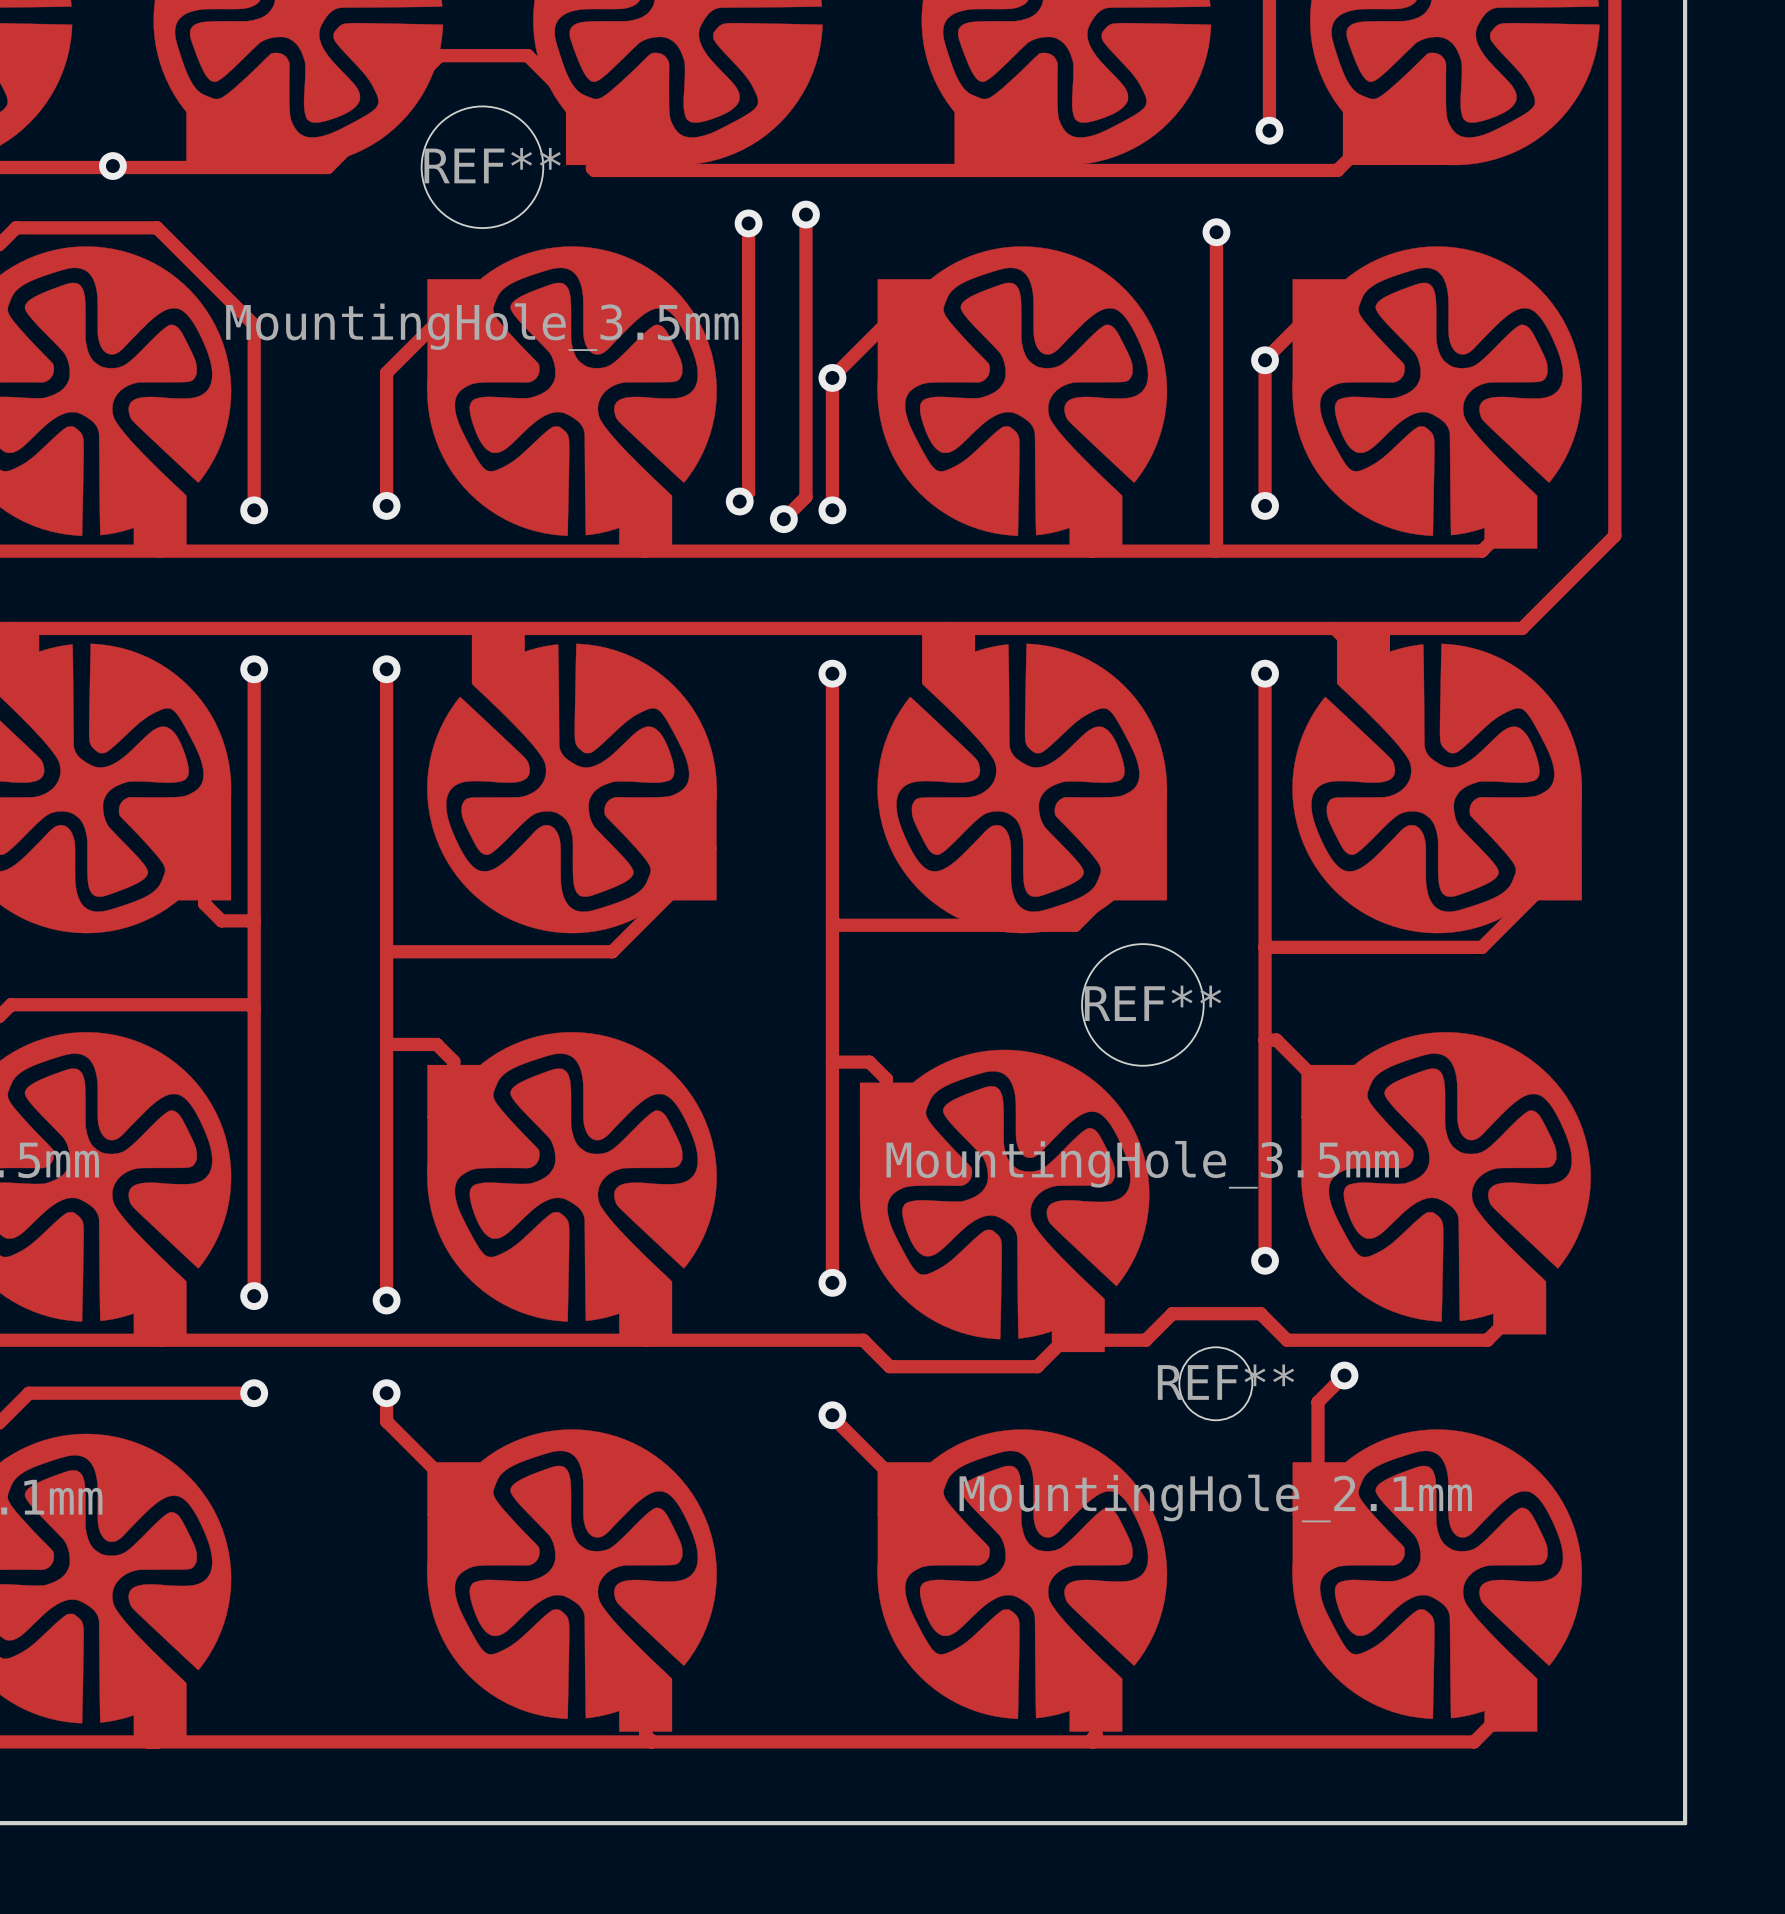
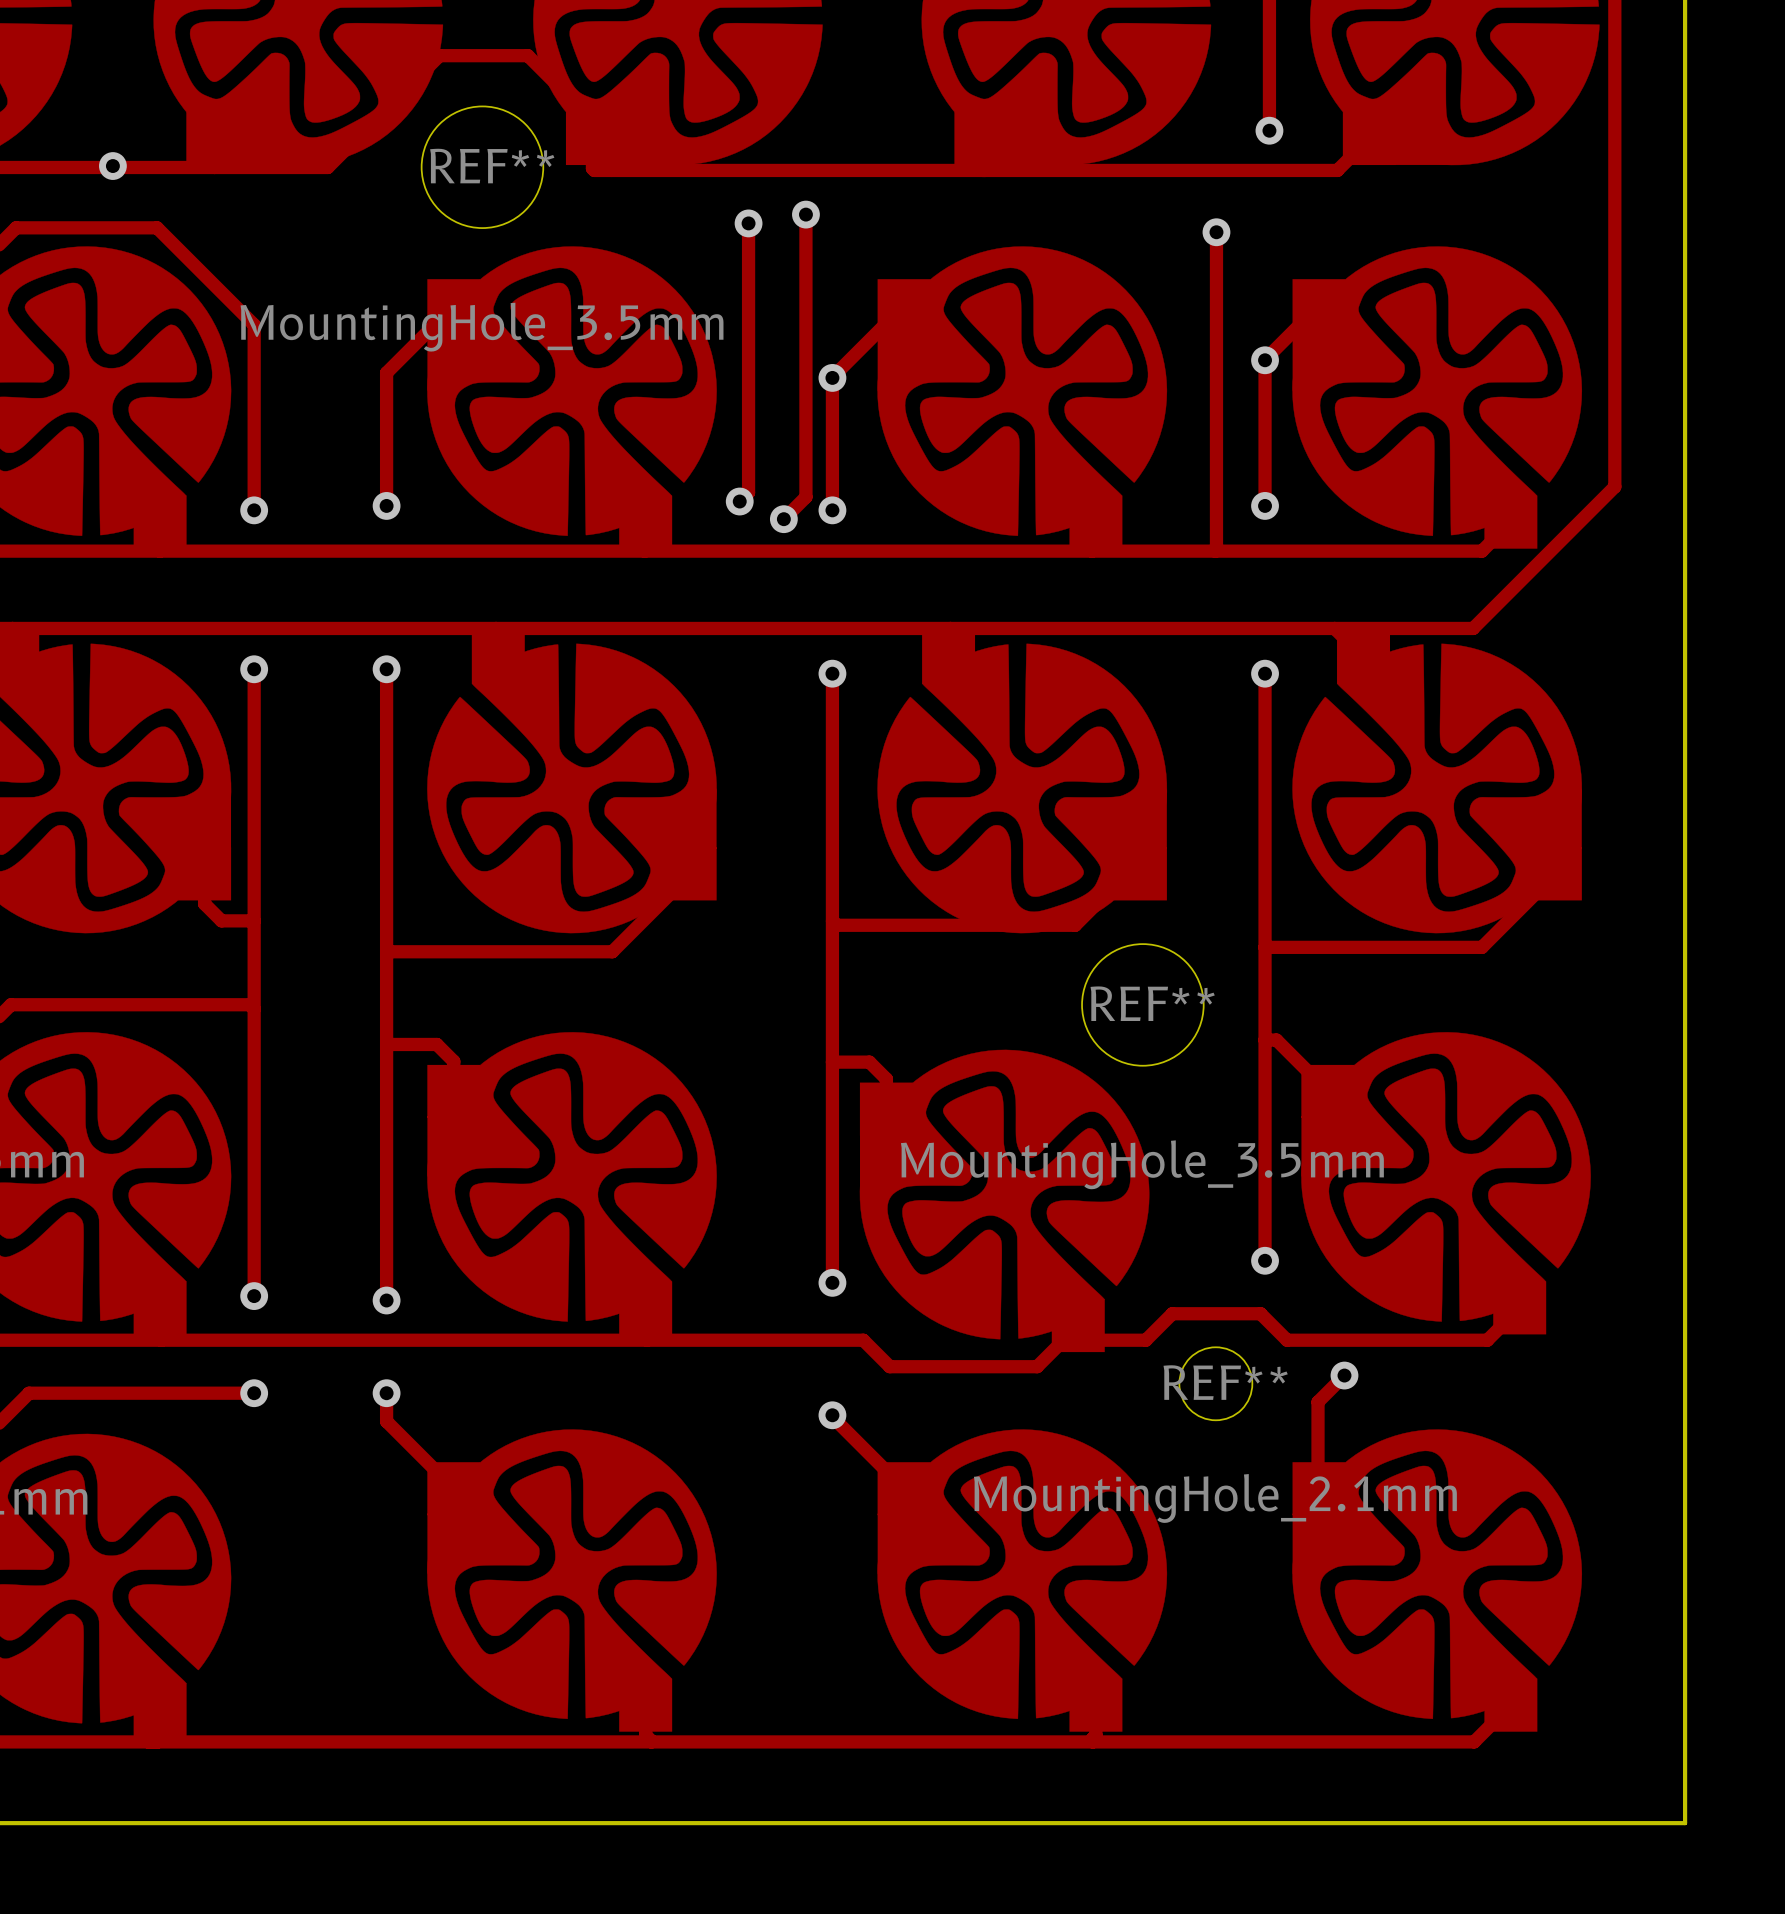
track: (1614, 486) (1614, 535) (1522, 628) (1473, 628) -> (1614, 486) (1473, 628)

